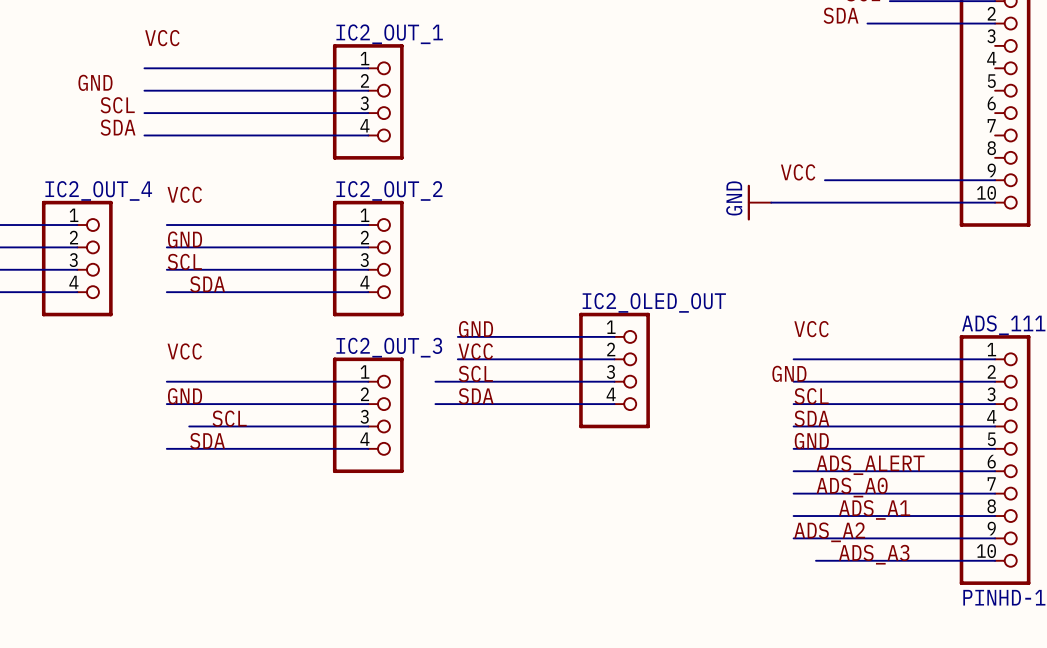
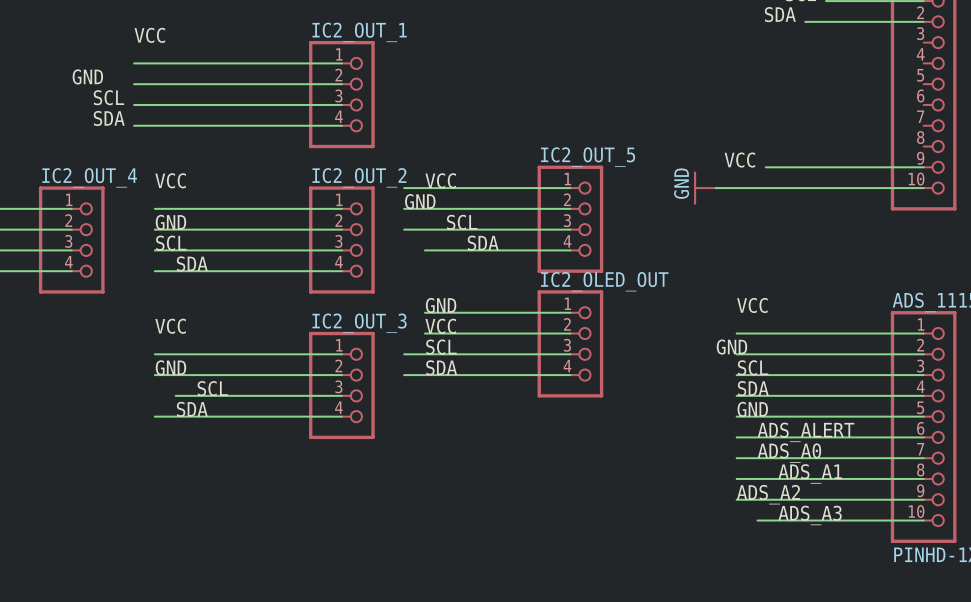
label: none -> VCC (440, 180)
wire: none -> (404, 188) (570, 188)
label: none -> GND (420, 201)
wire: none -> (404, 208) (570, 208)
IC2_OUT_5: none -> (570, 219)
label: none -> SCL (462, 222)
wire: none -> (404, 229) (570, 229)
label: none -> SDA (483, 243)
wire: none -> (424, 250) (570, 250)

